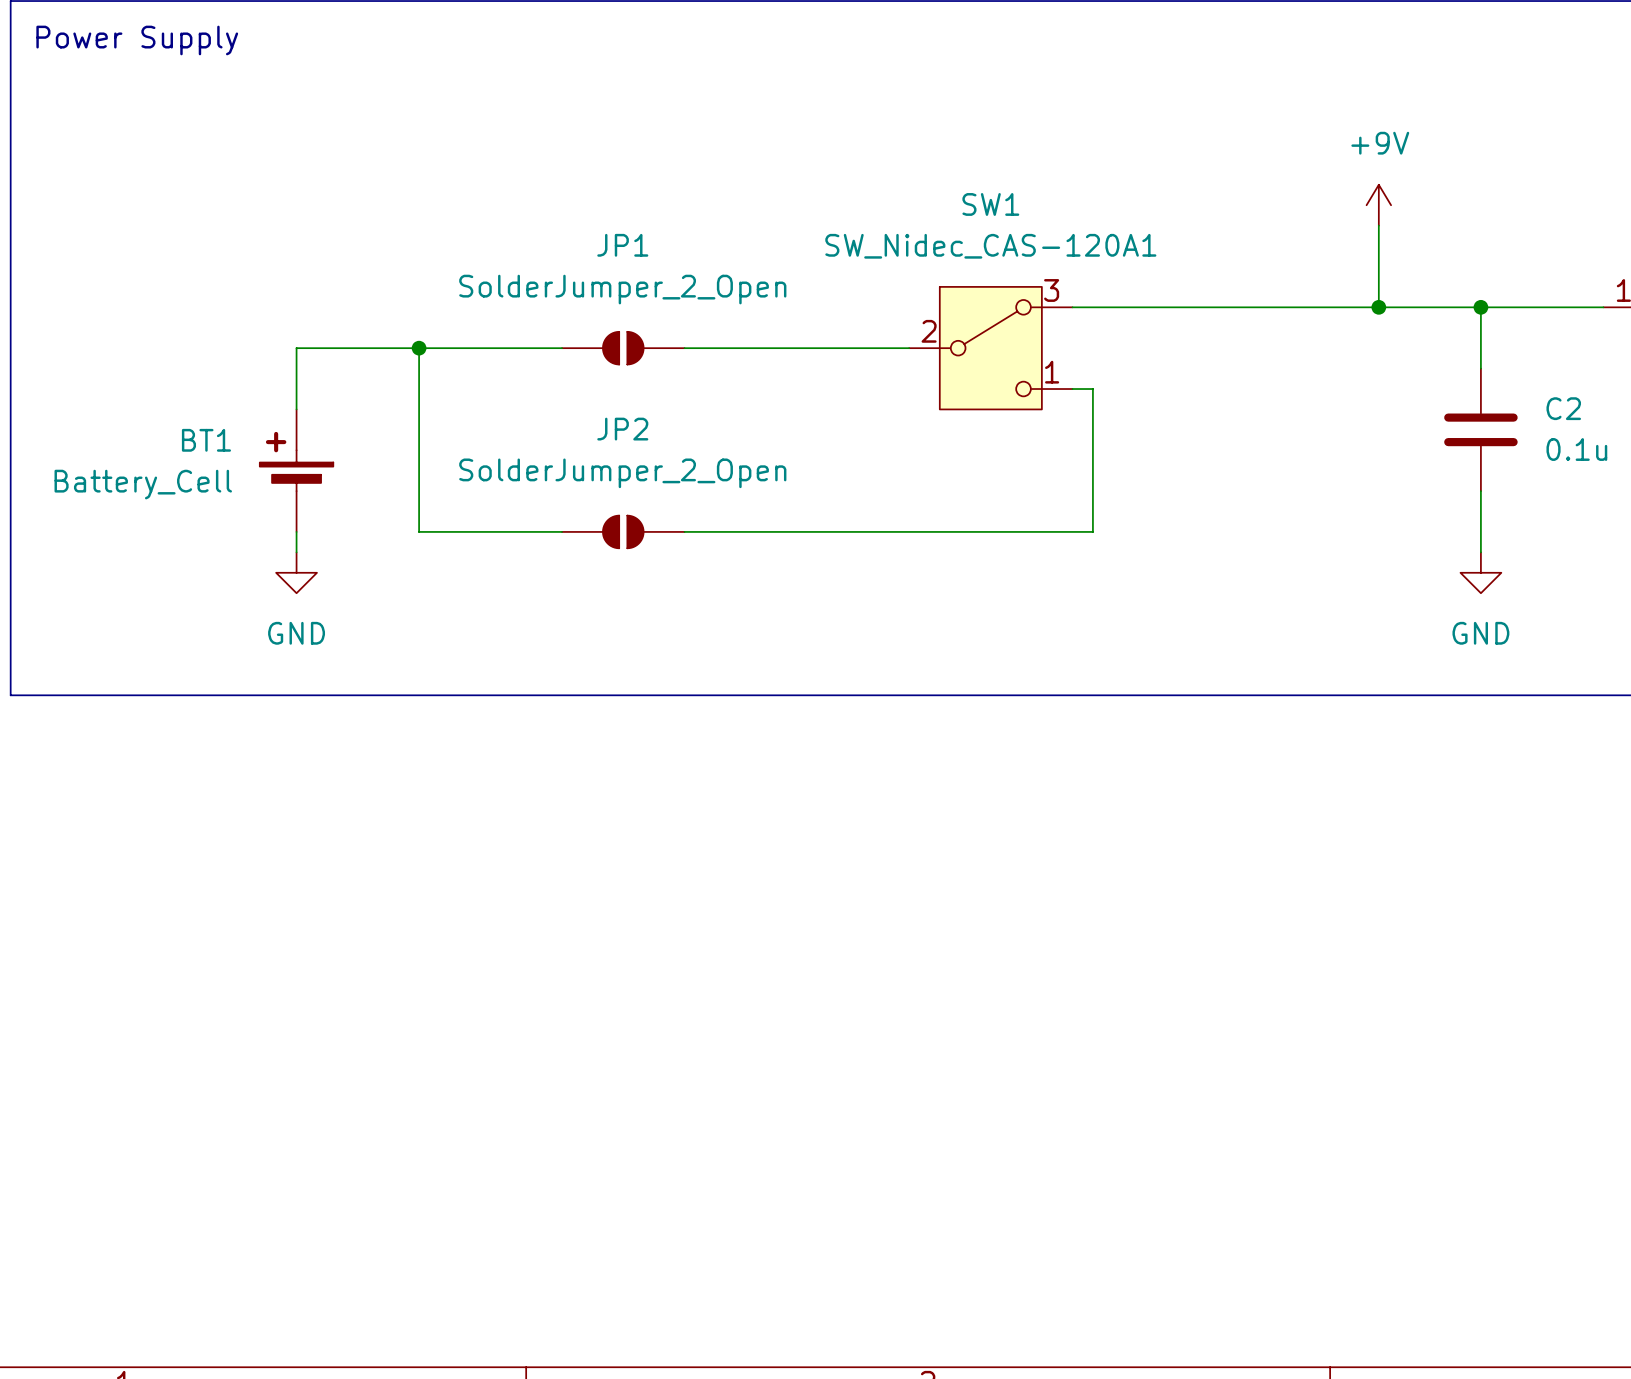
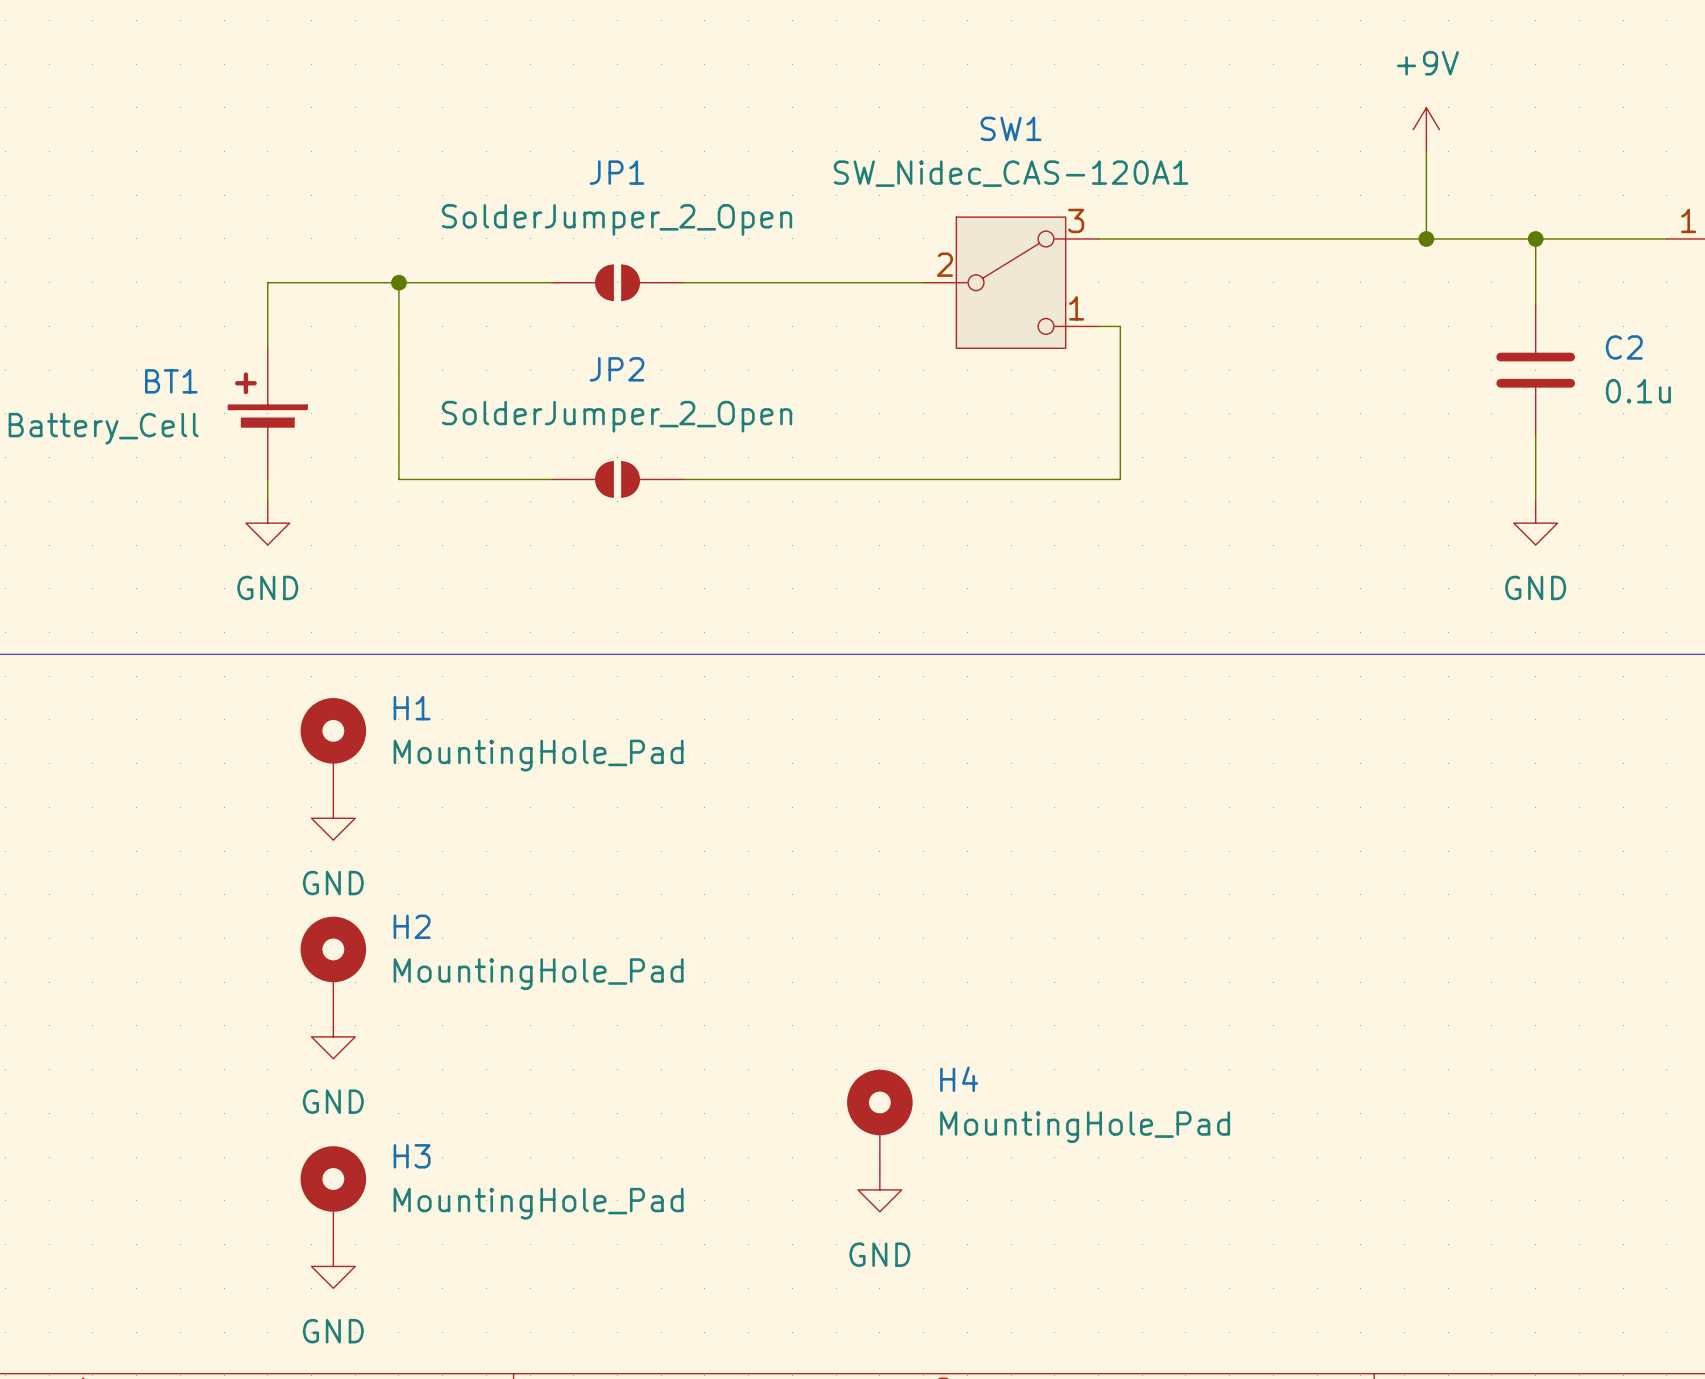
H1: none -> MountingHole_Pad (333, 747)
power symbol: none -> GND (333, 818)
H2: none -> MountingHole_Pad (333, 965)
power symbol: none -> GND (333, 1036)
H4: none -> MountingHole_Pad (879, 1118)
power symbol: none -> GND (879, 1189)
H3: none -> MountingHole_Pad (333, 1195)
power symbol: none -> GND (333, 1266)

